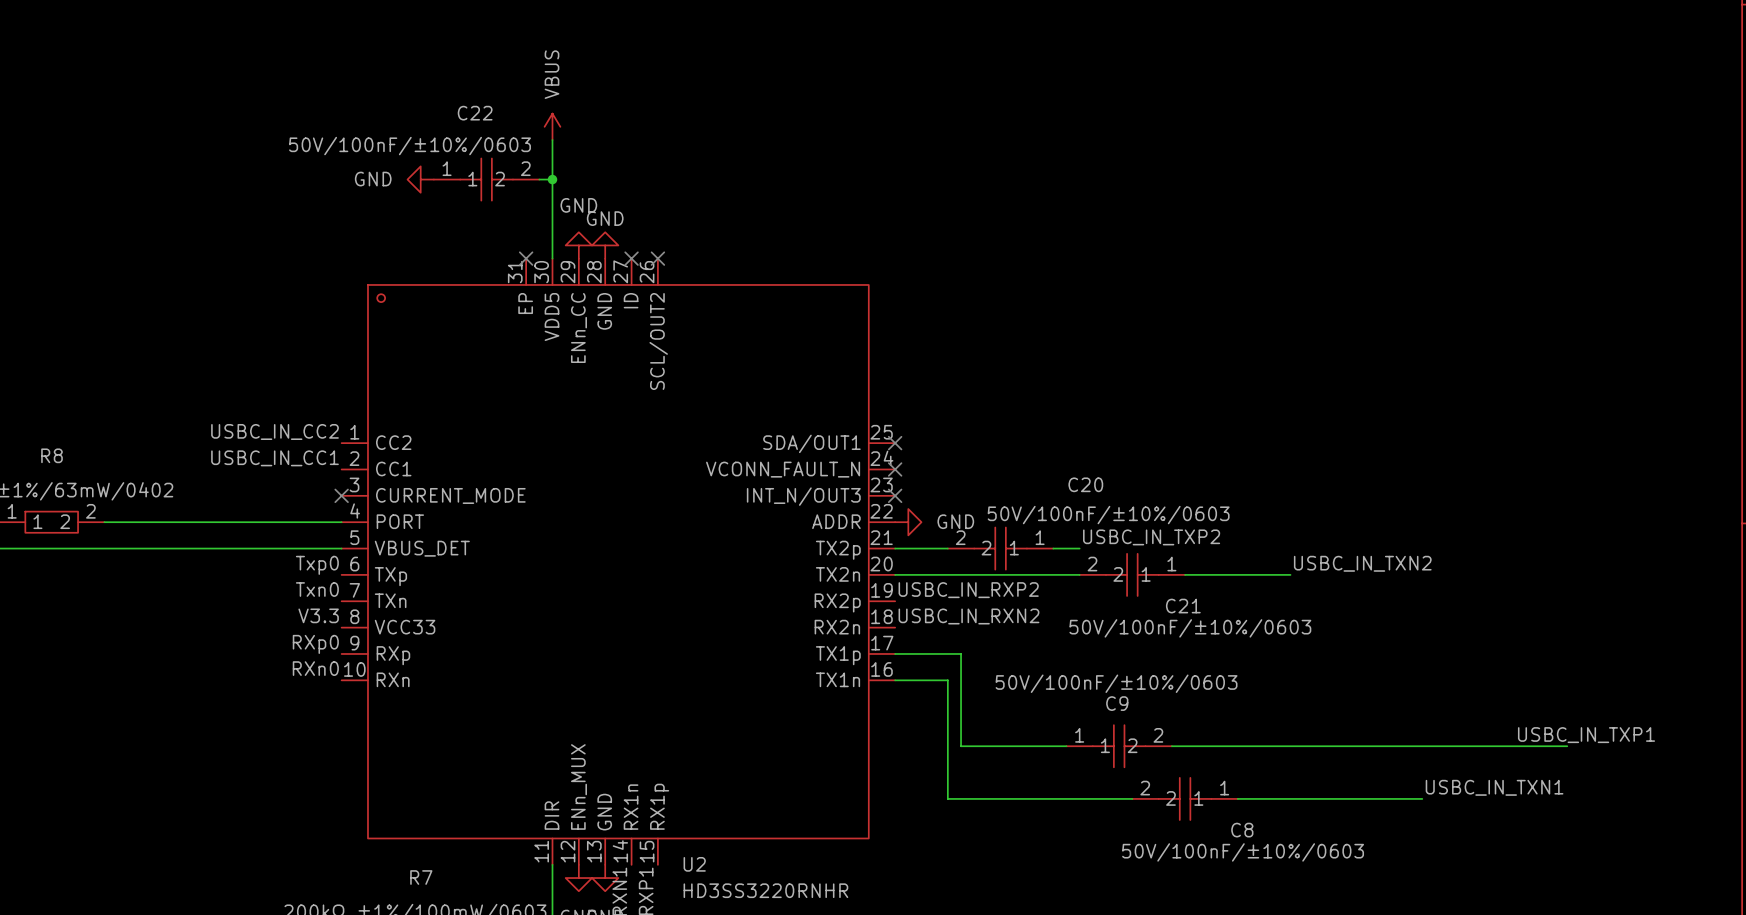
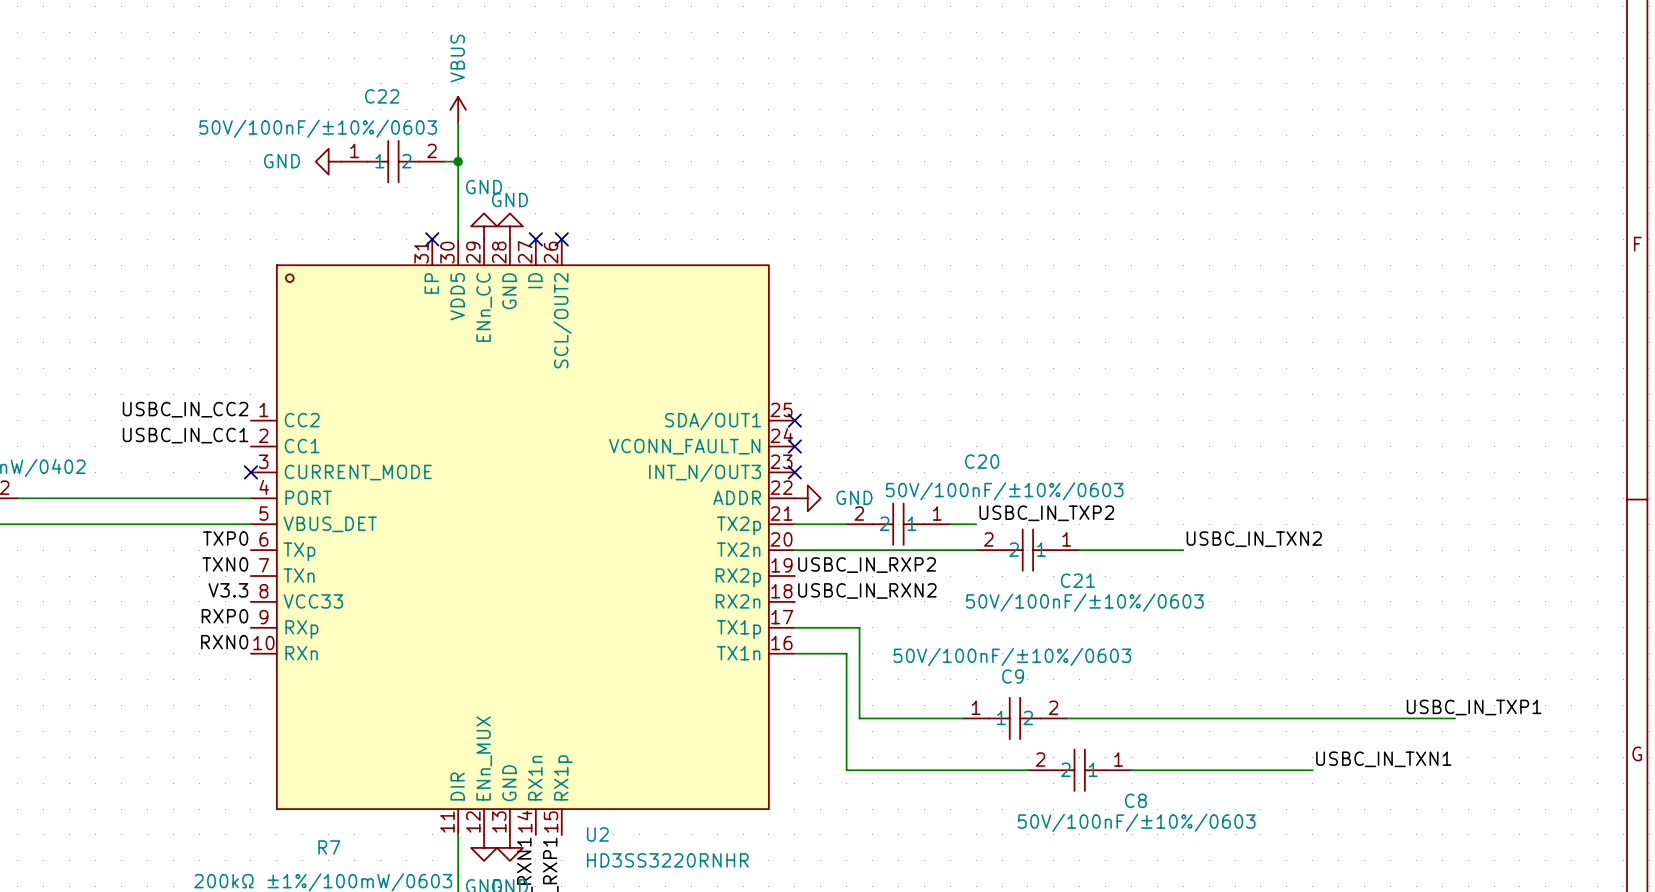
label: Txp0 (317, 565) -> TXP0 (225, 538)
label: Txn0 (317, 589) -> TXN0 (225, 564)
label: RXp0 (315, 644) -> RXP0 (224, 616)
label: RXn0 (315, 668) -> RXN0 (224, 642)

